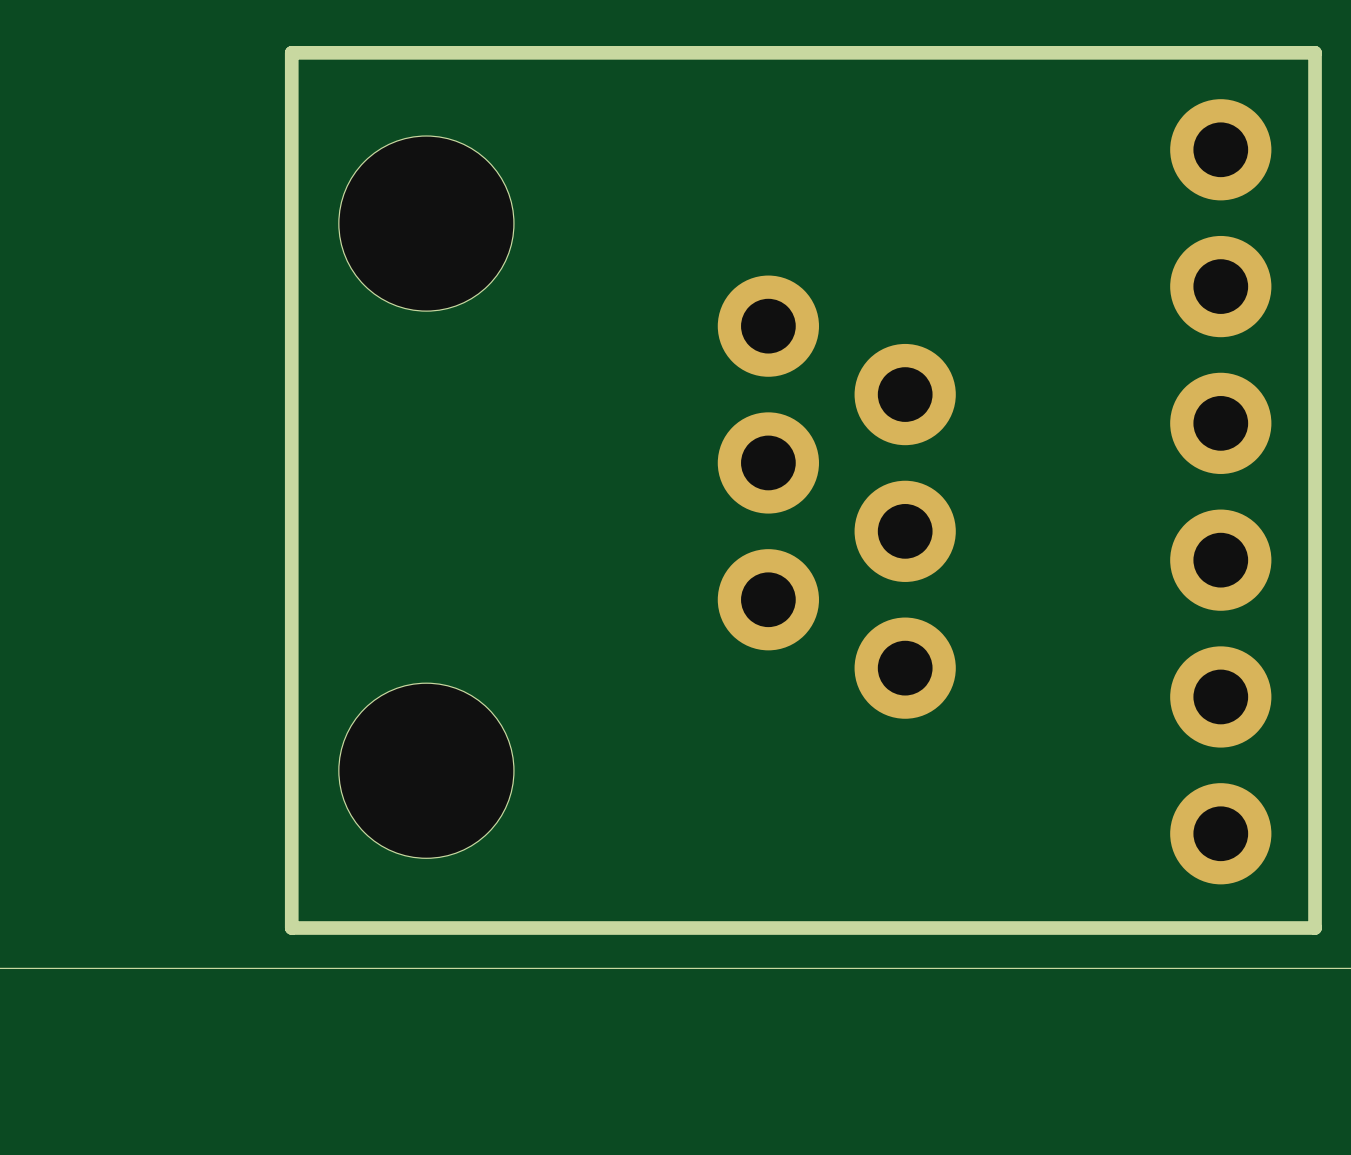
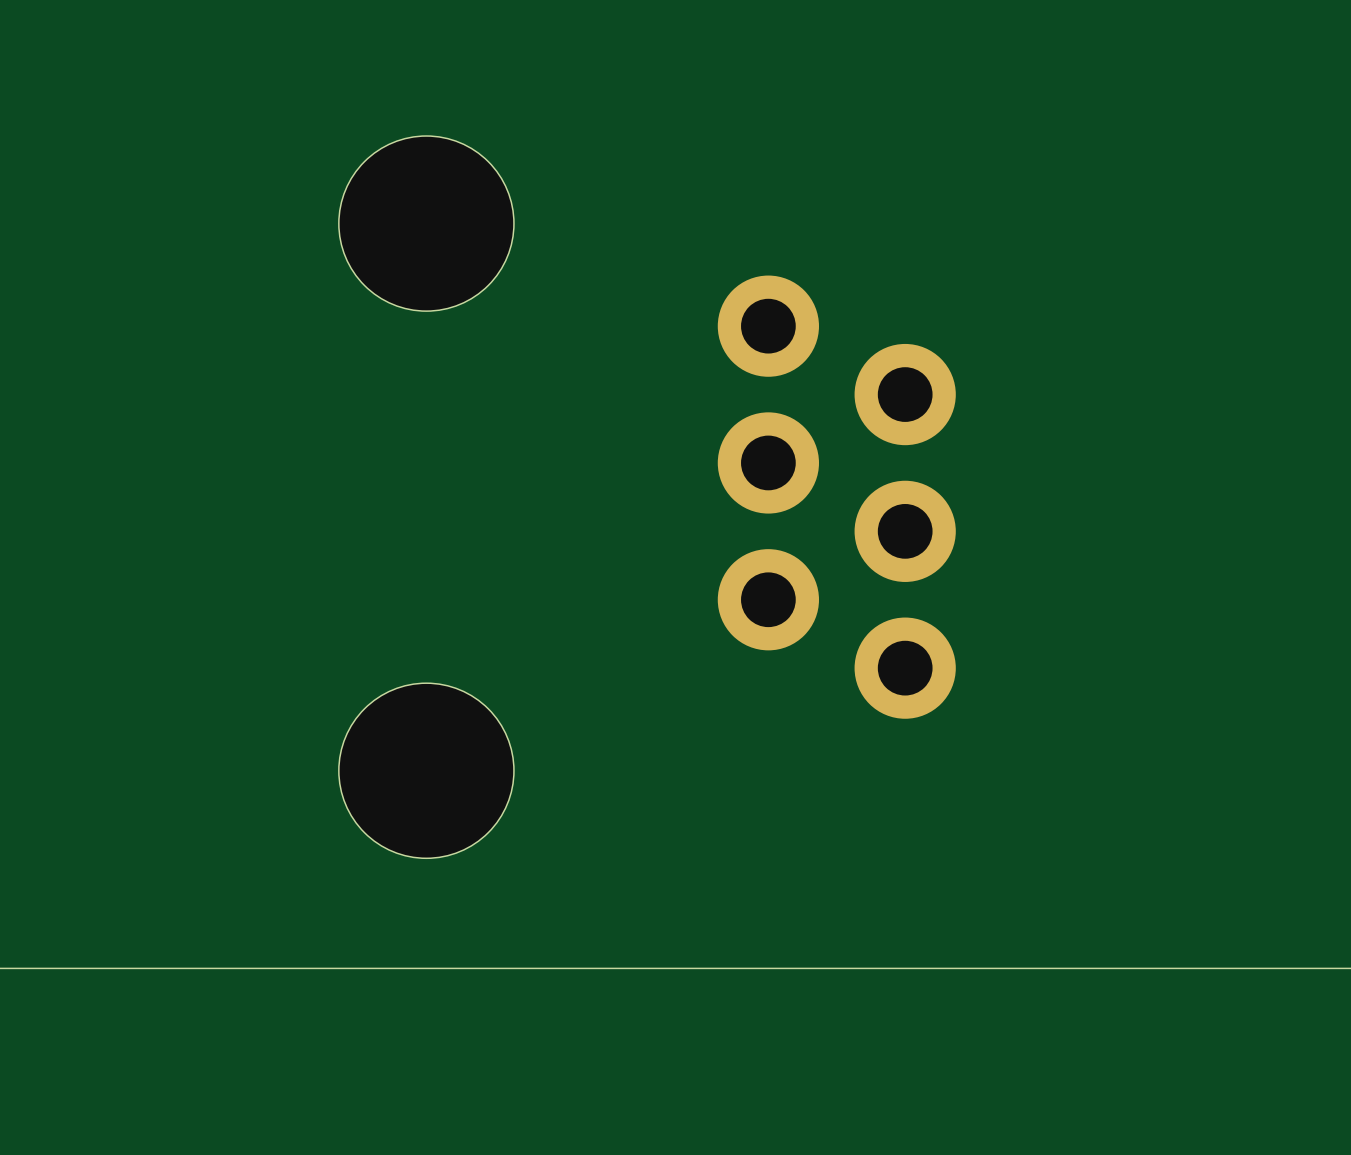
board edge: (1315, 52) (1315, 928) (291, 928) (291, 52) (1315, 52) -> none
part: (1220, 491) -> none

